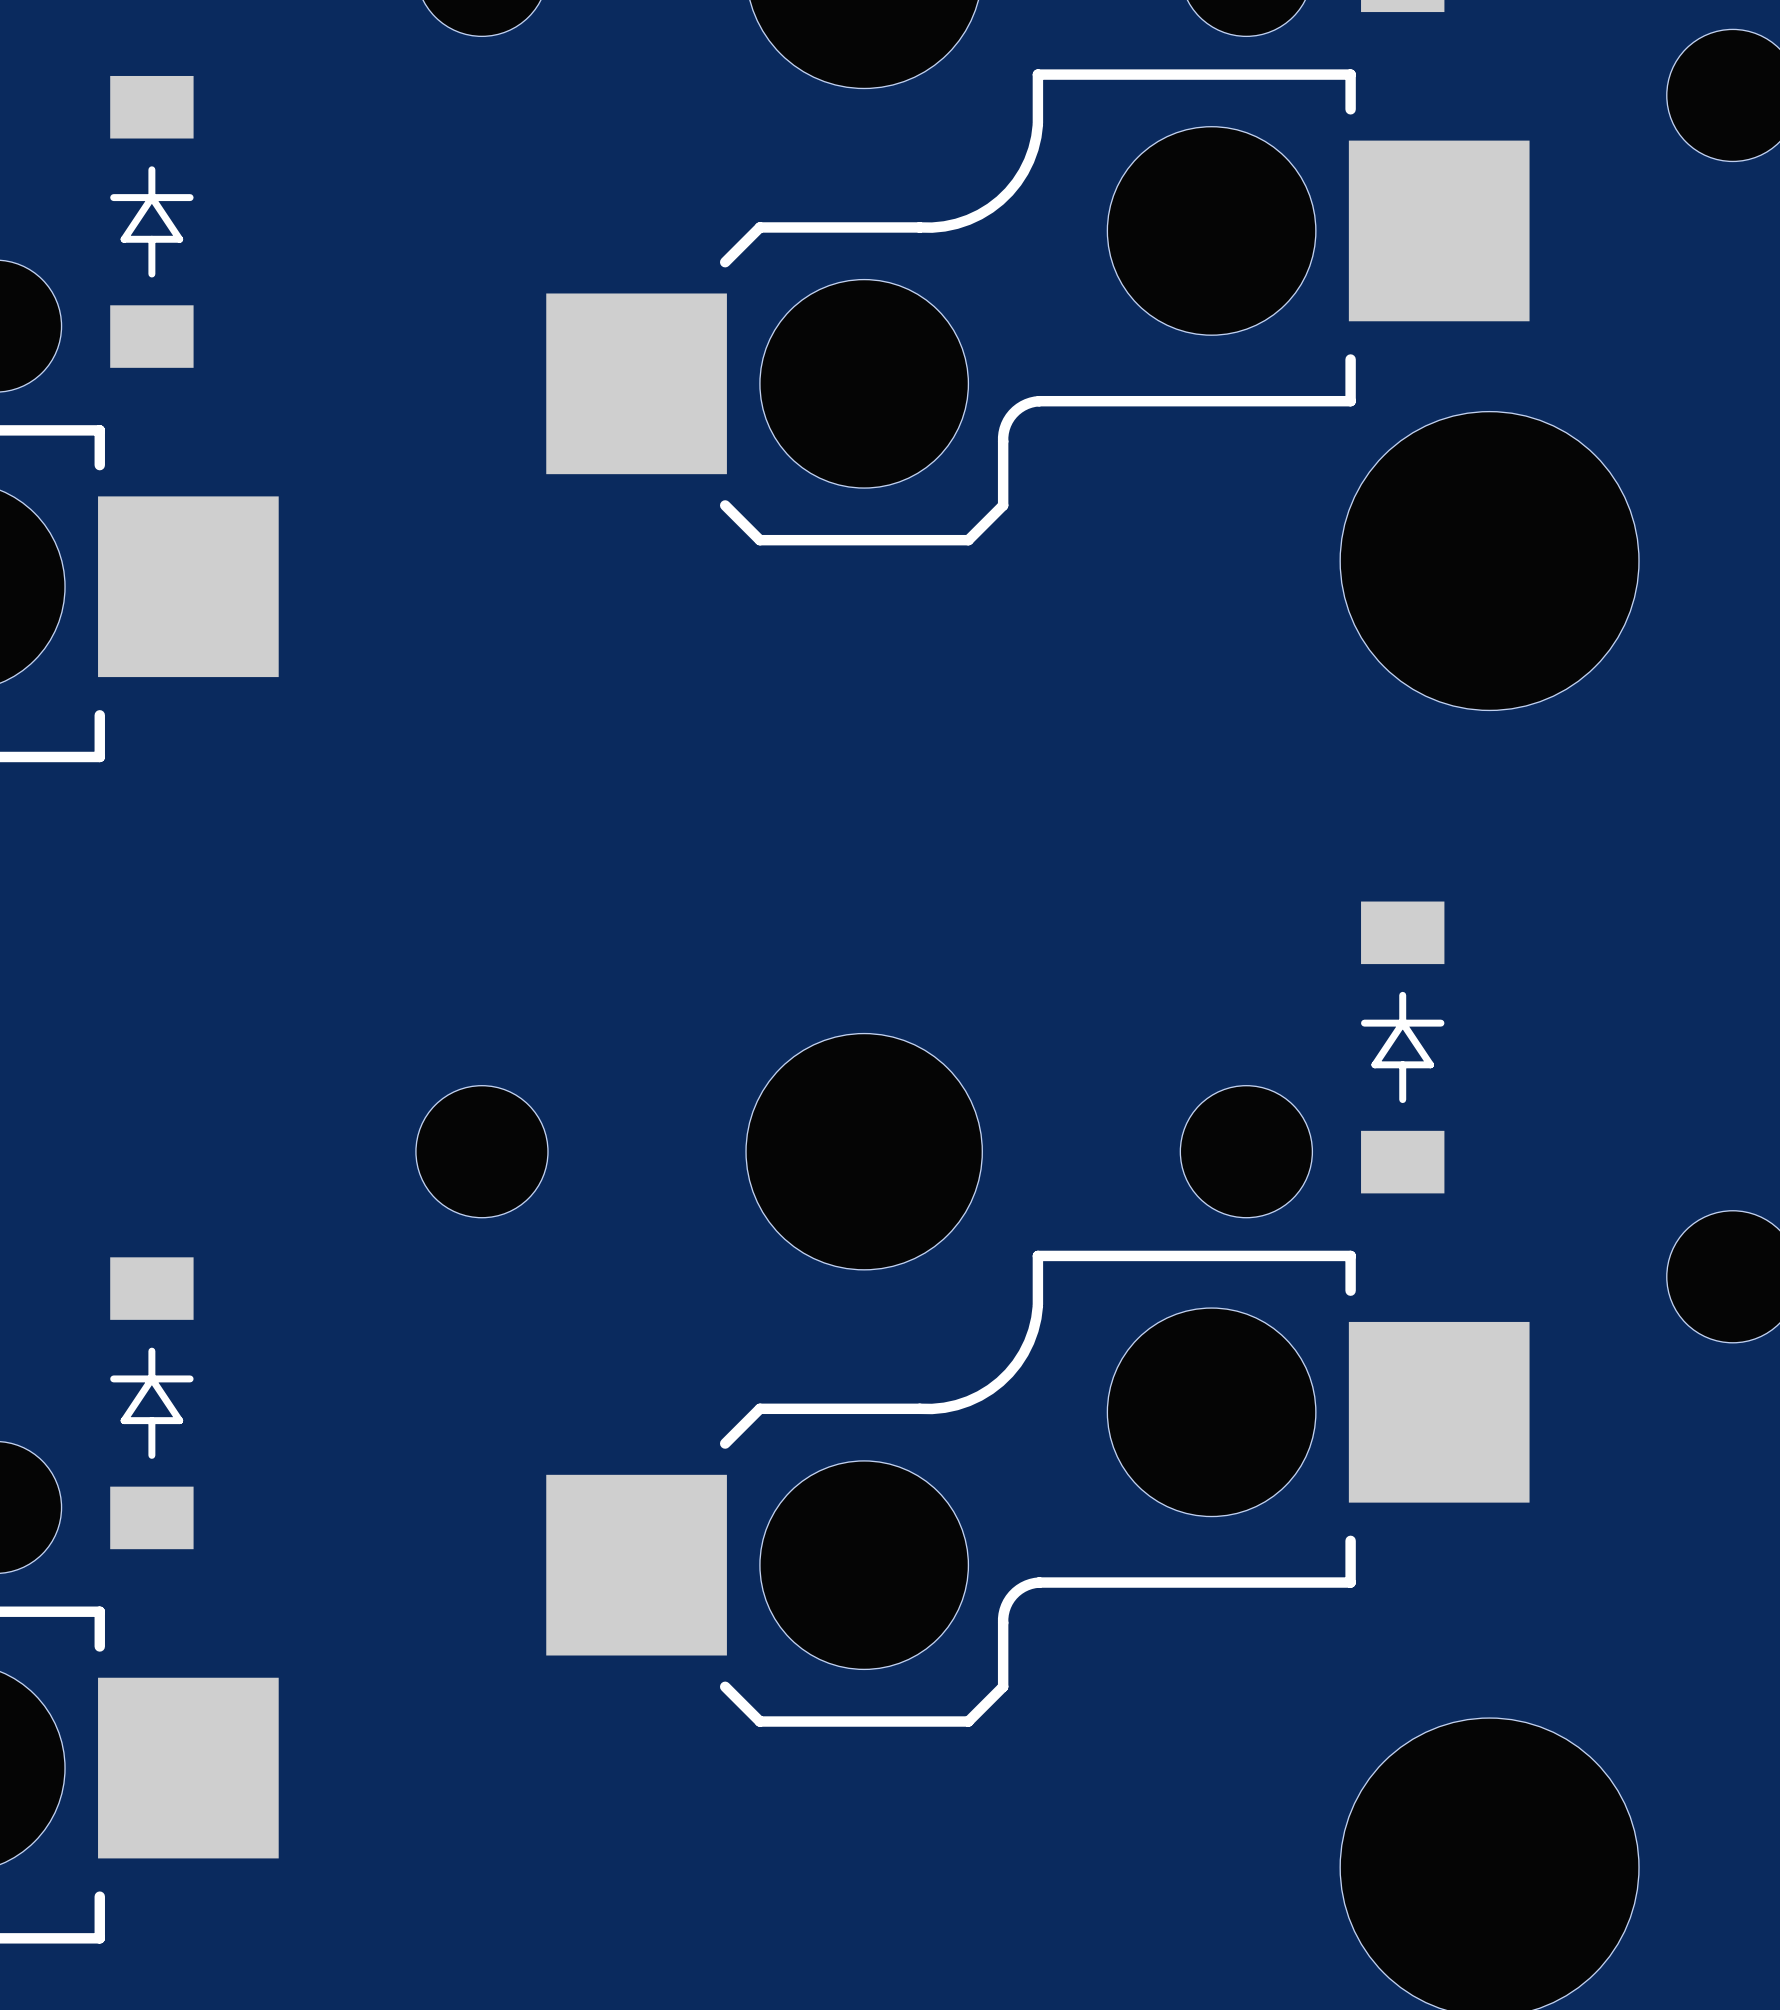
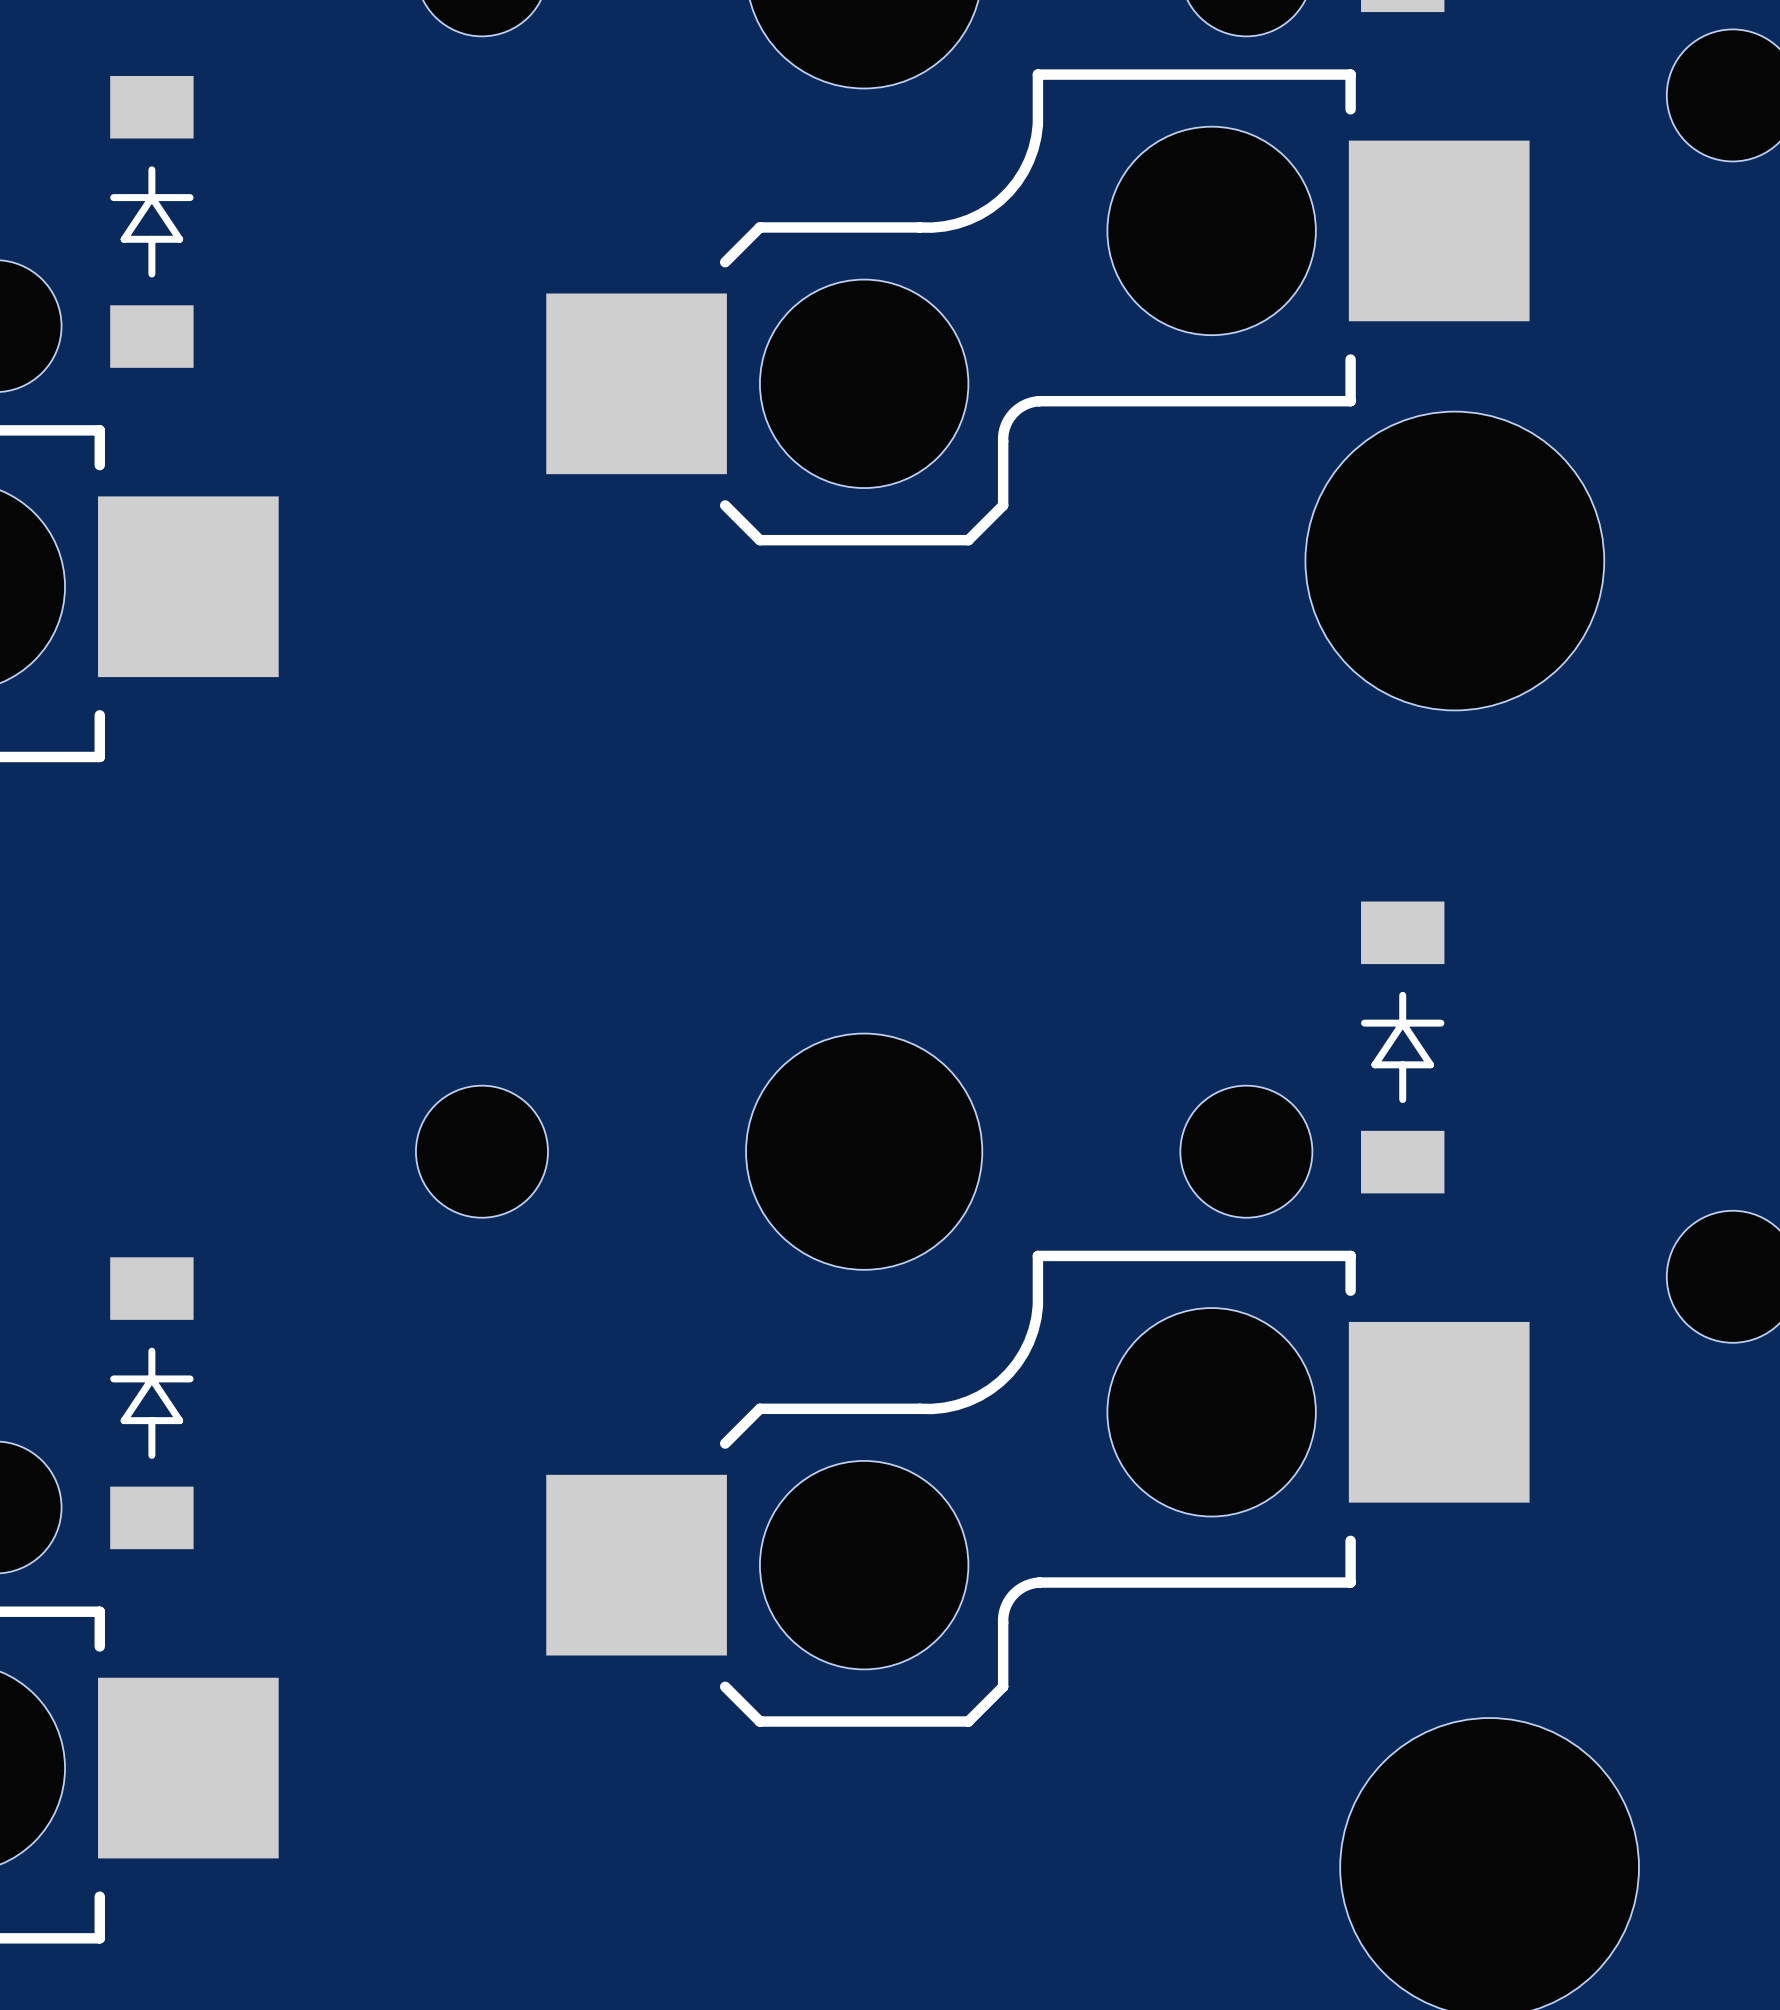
part position: (1489, 561) -> (1454, 561)

